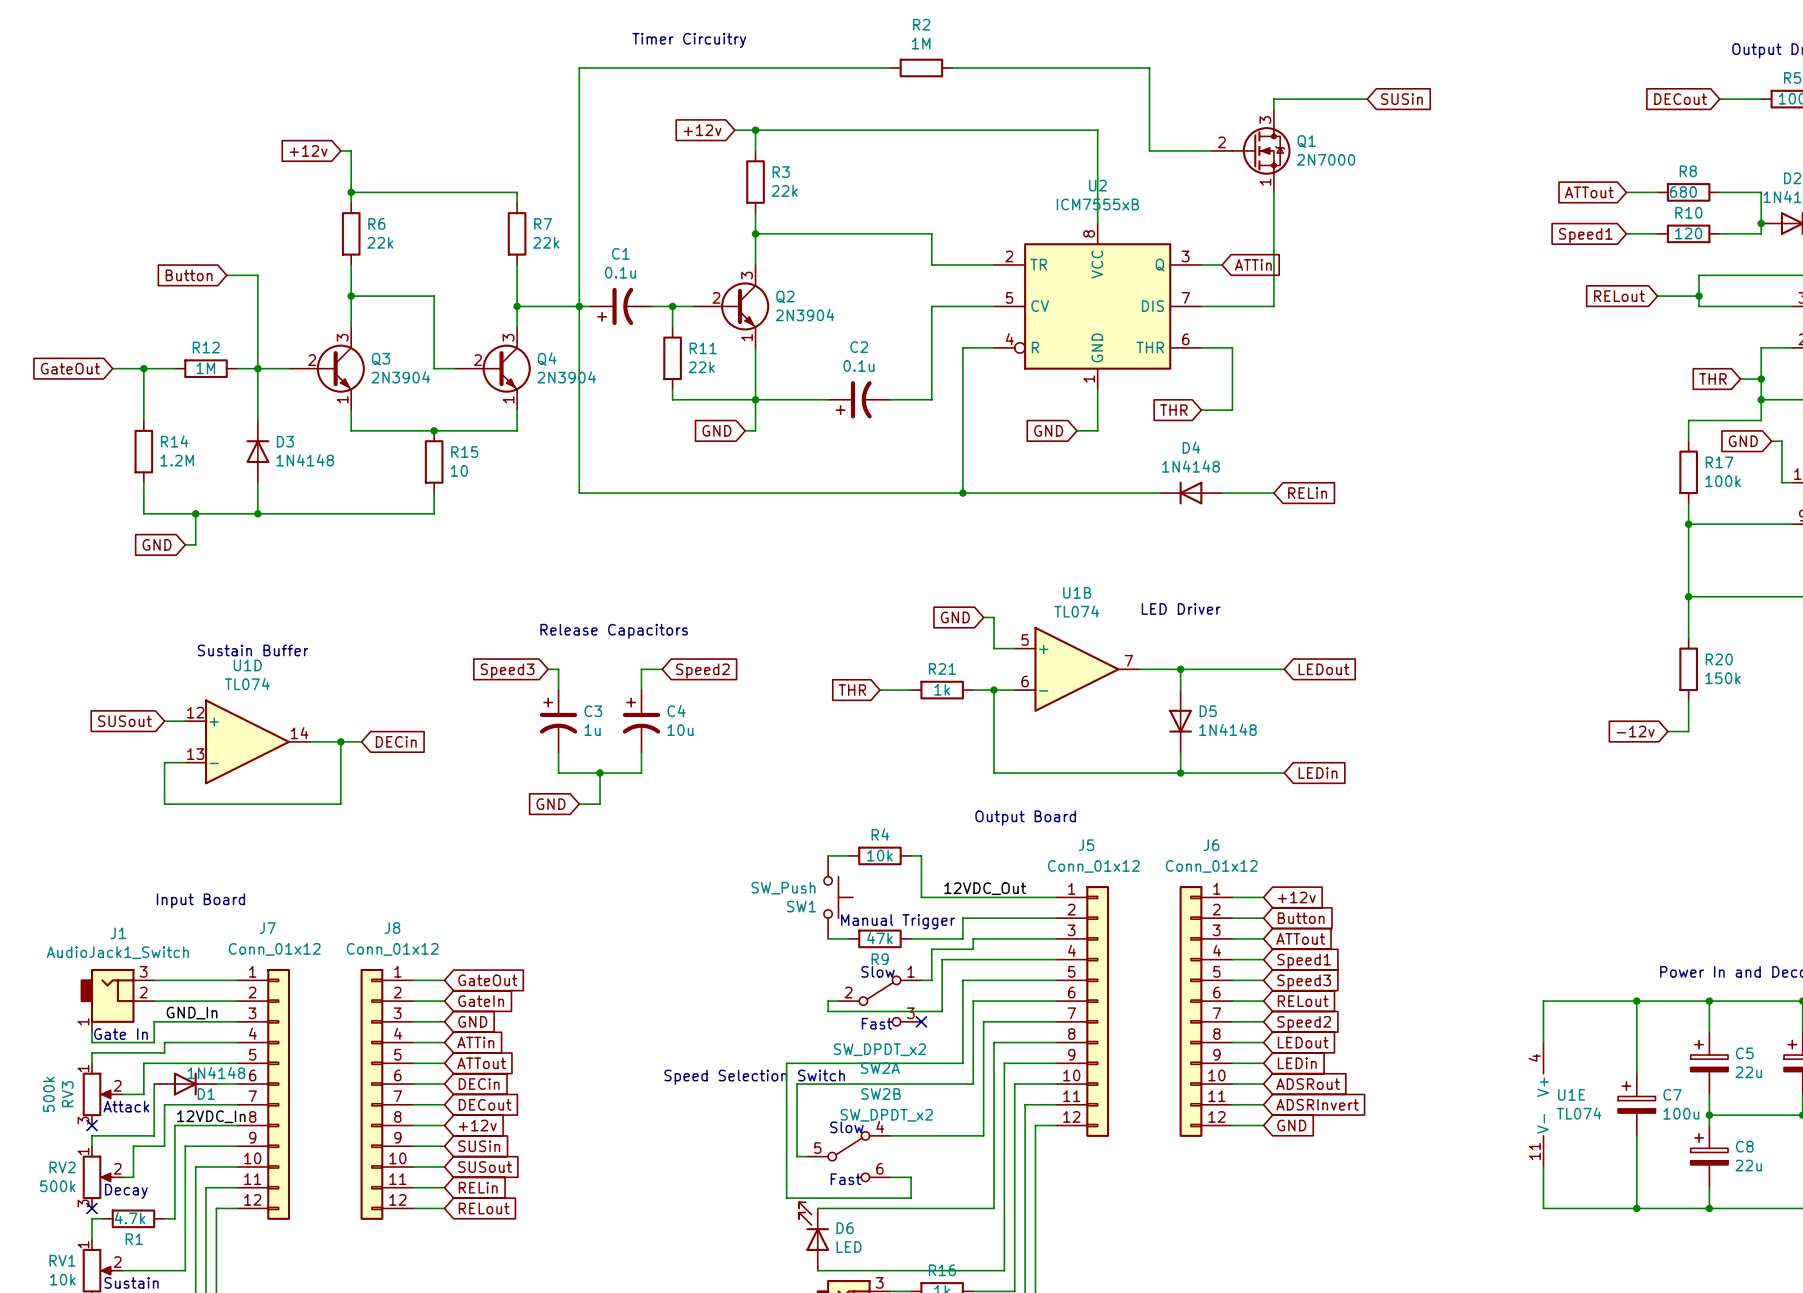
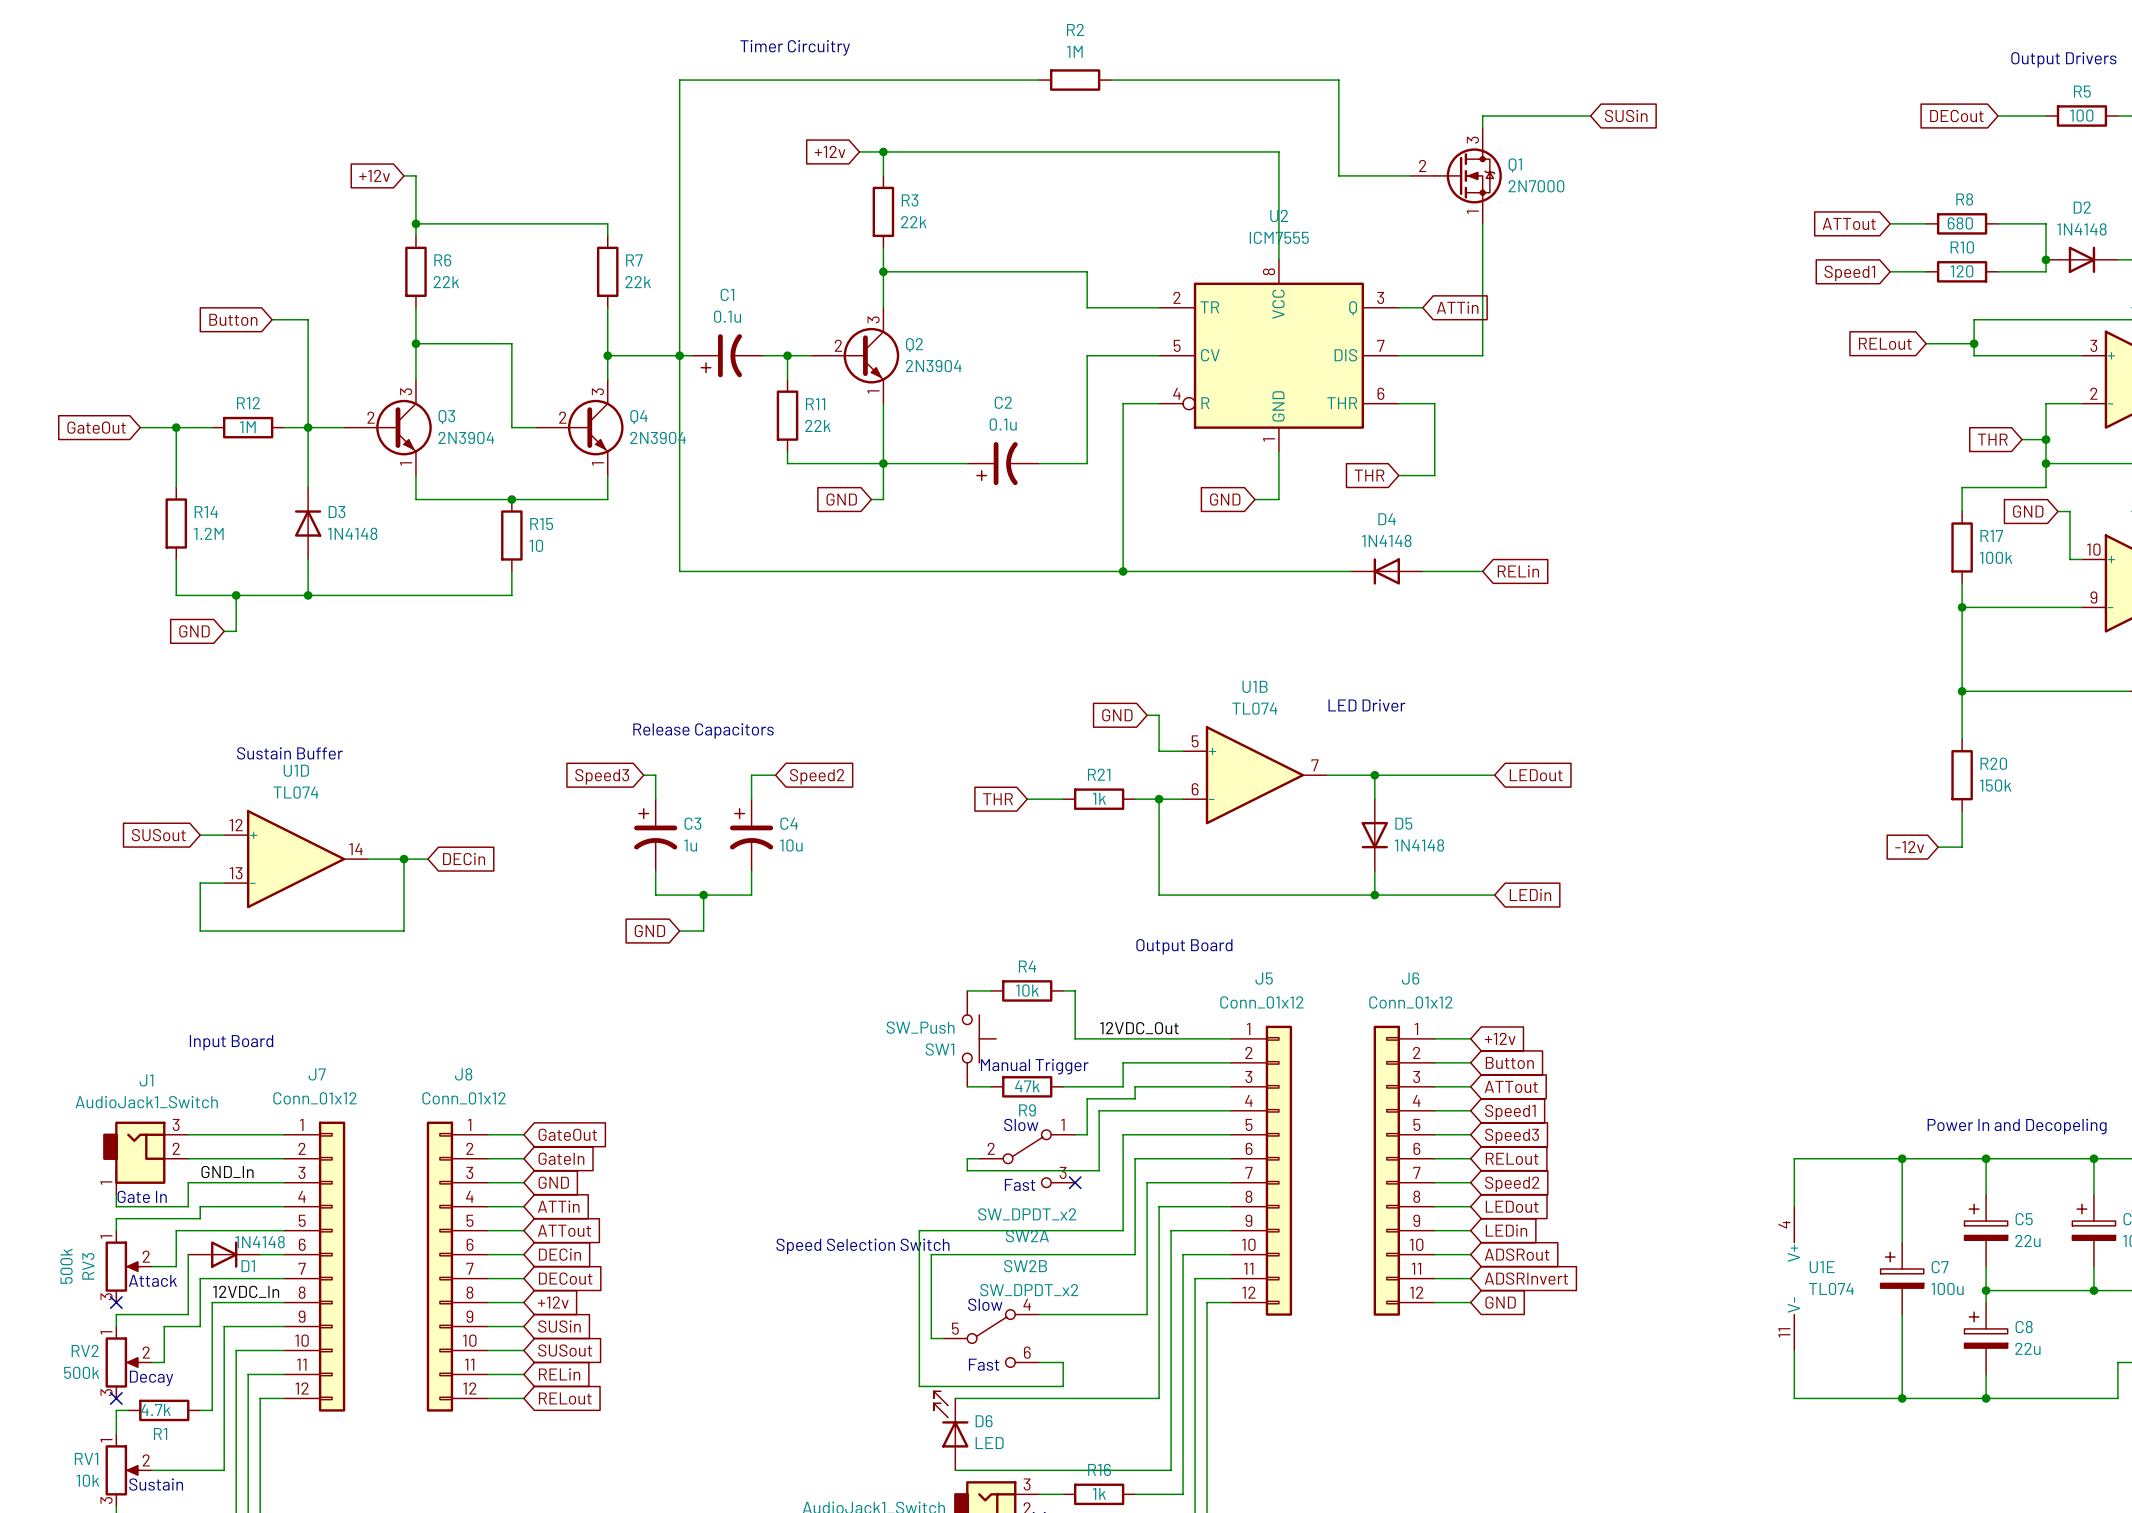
U2 value: ICM7555xB (1097, 204) -> ICM7555 (1279, 237)

